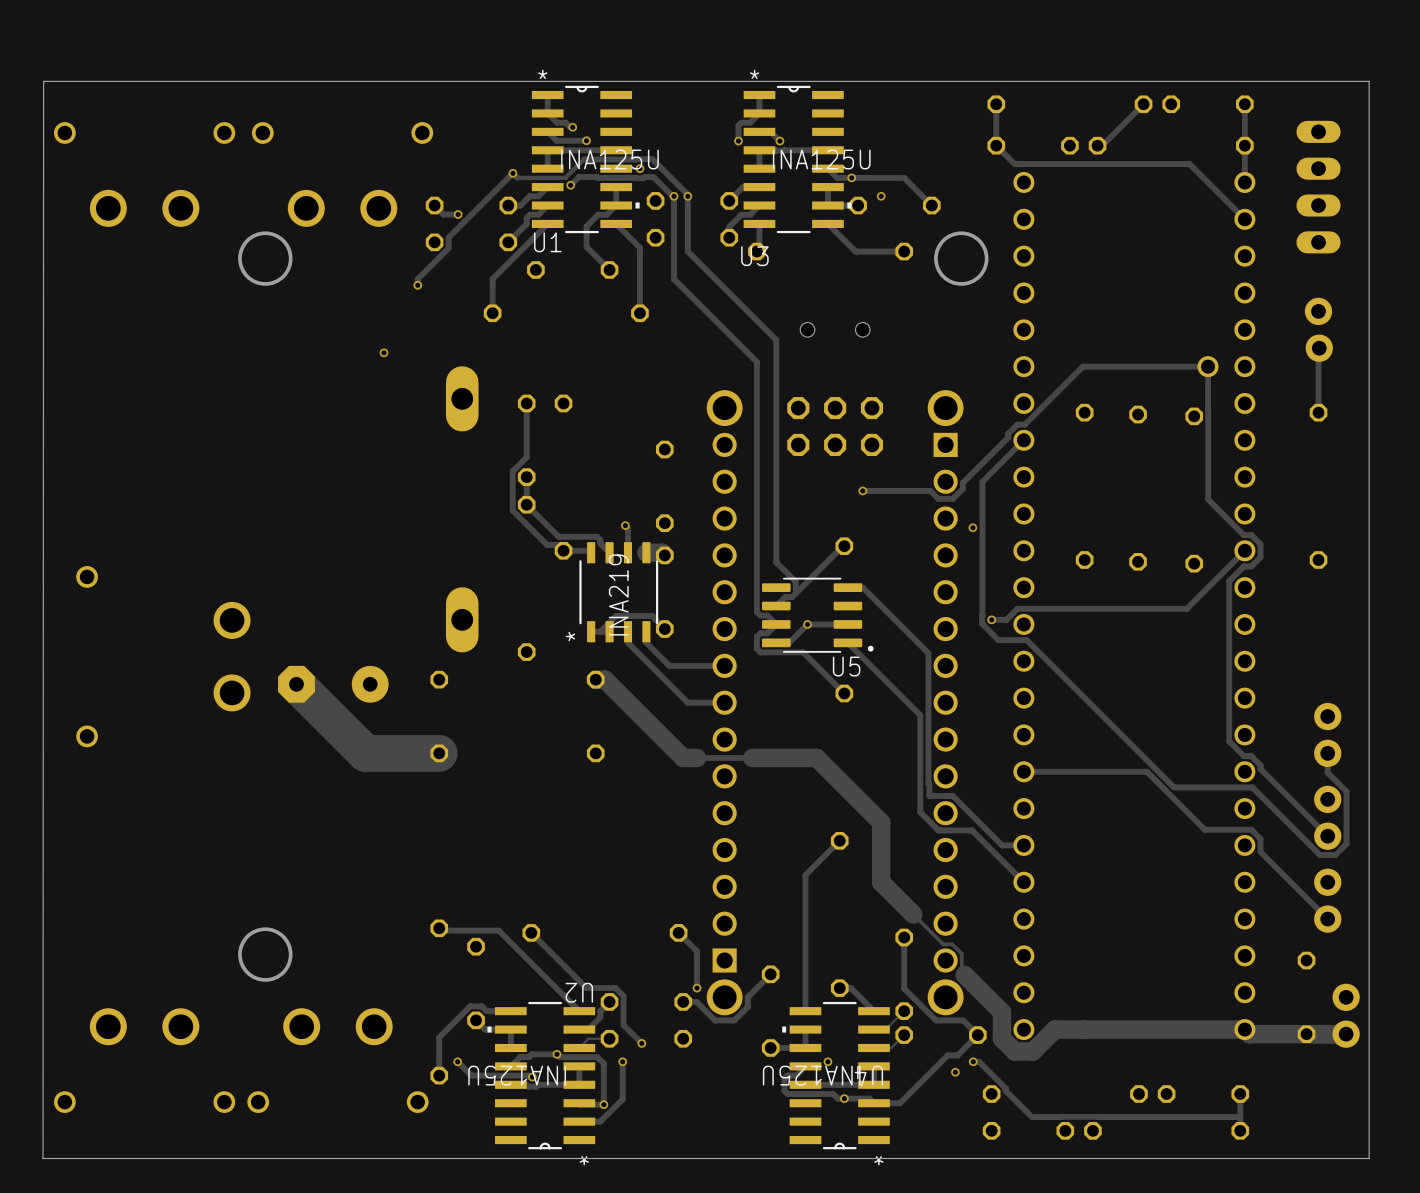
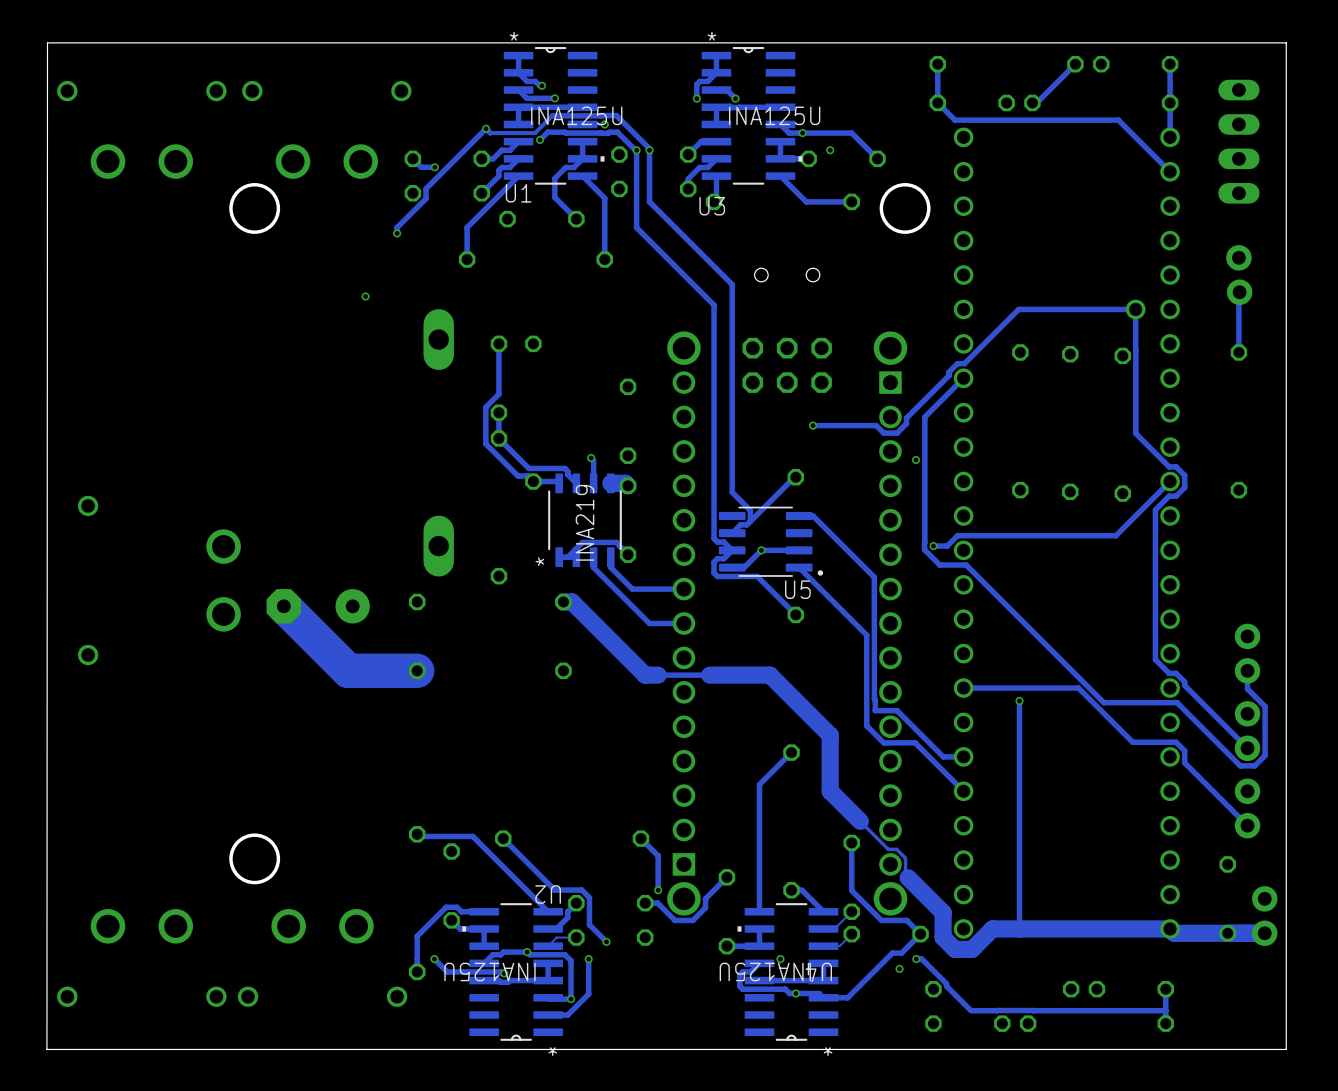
track: none -> (1019, 700) (1019, 928)
via: none -> (1019, 700)

